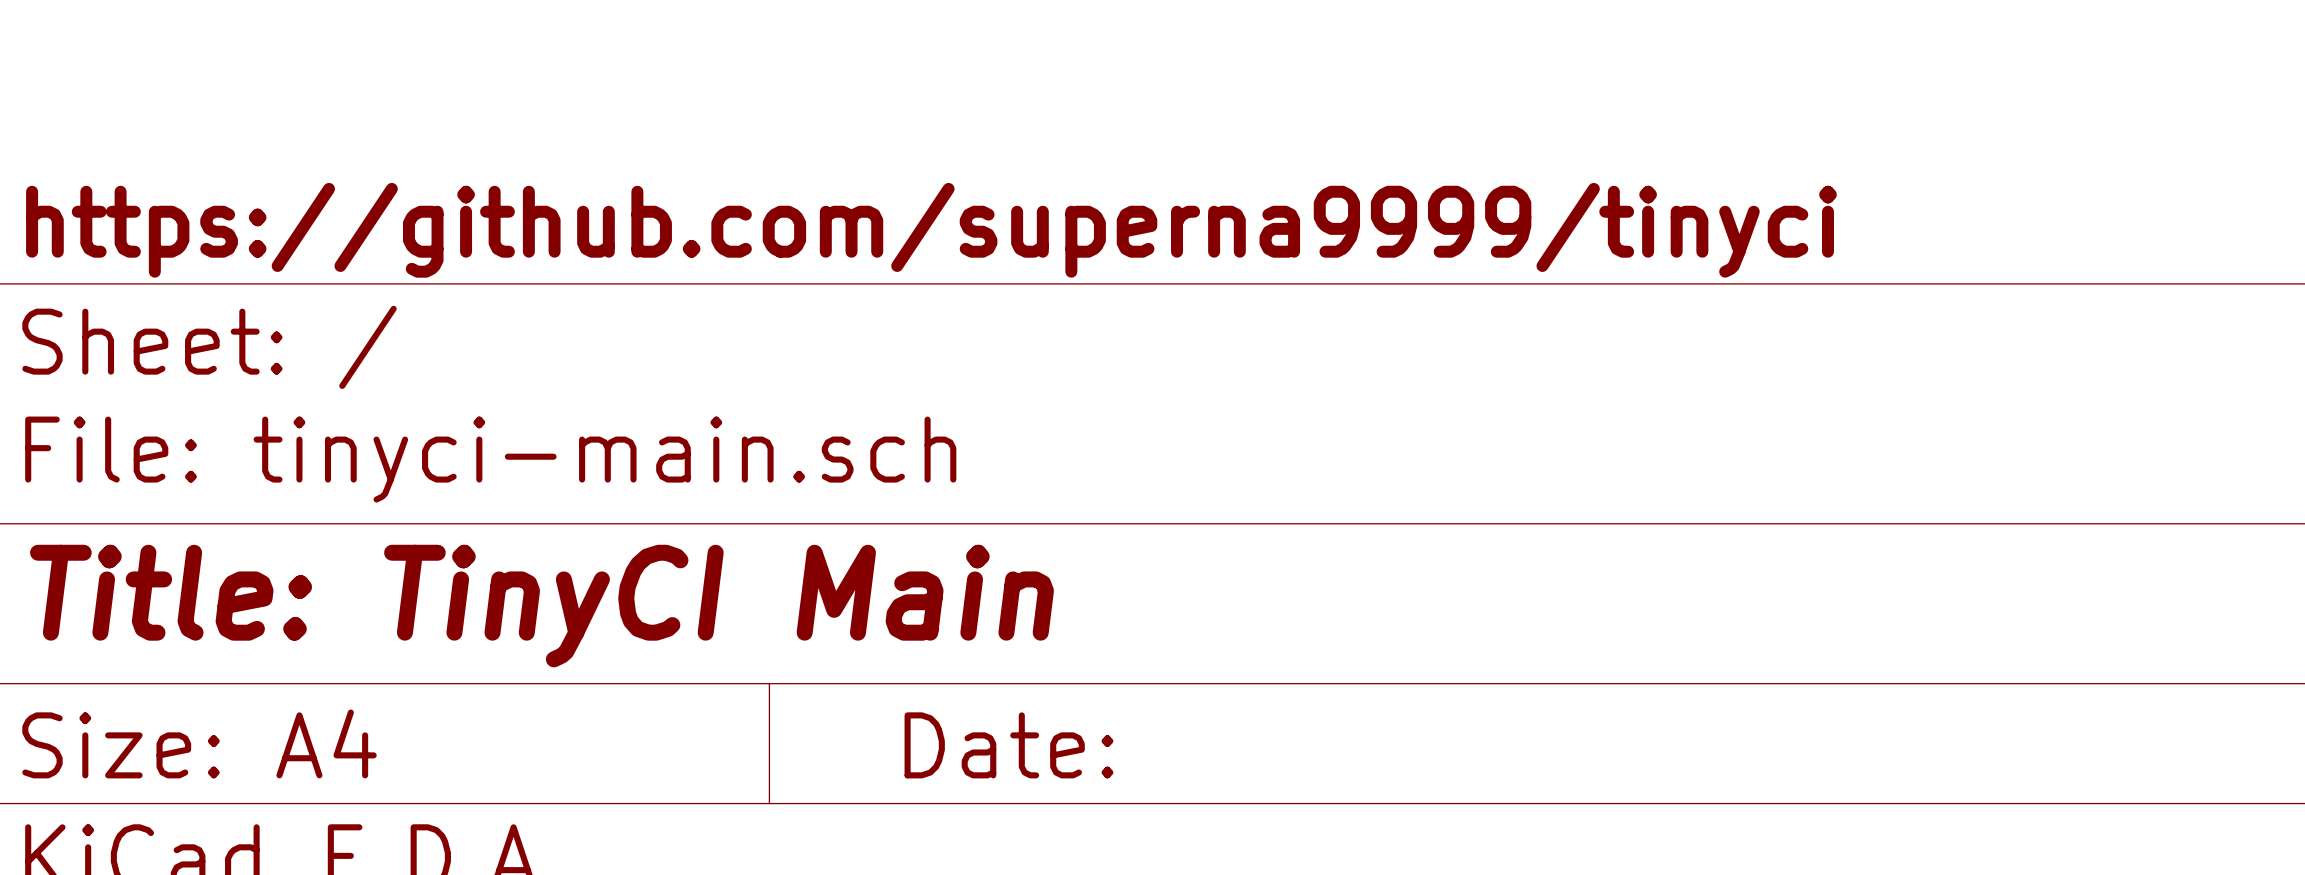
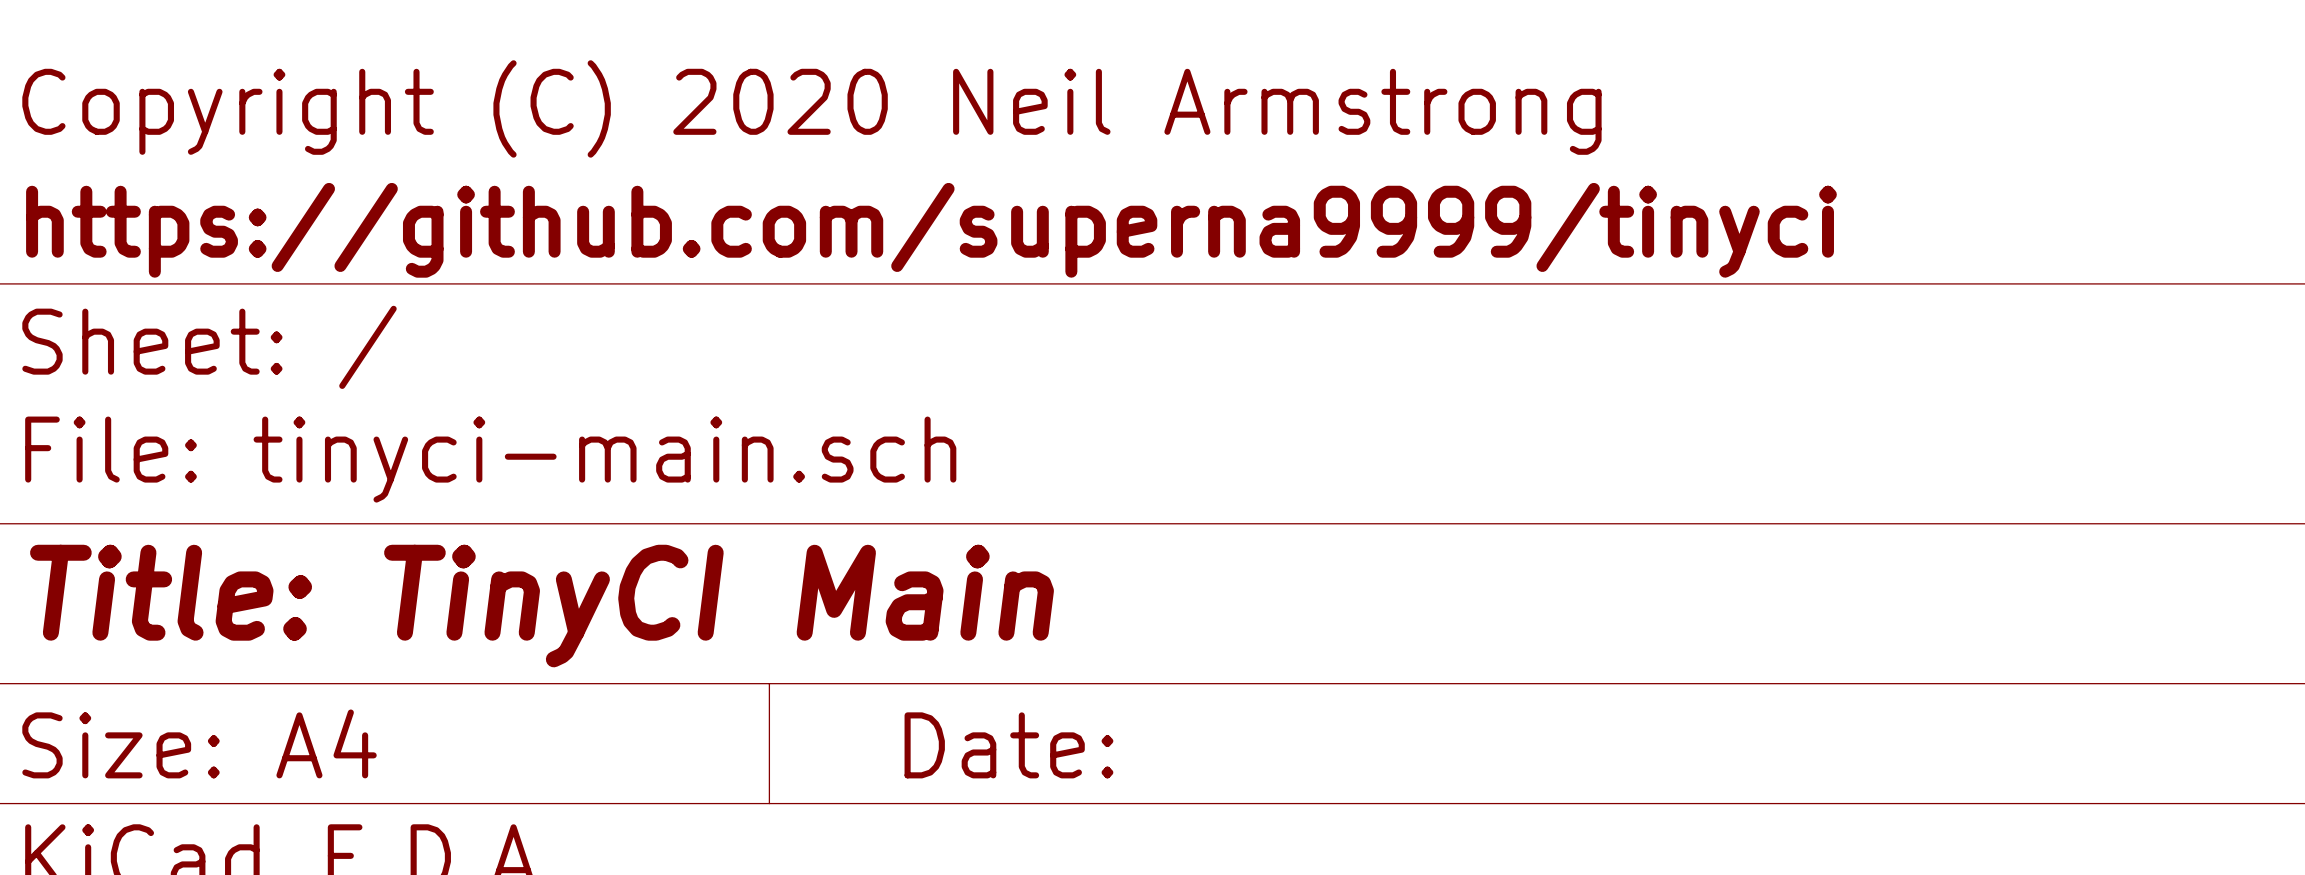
title block: none -> Copyright (C) 2020 Neil Armstrong (811, 108)

